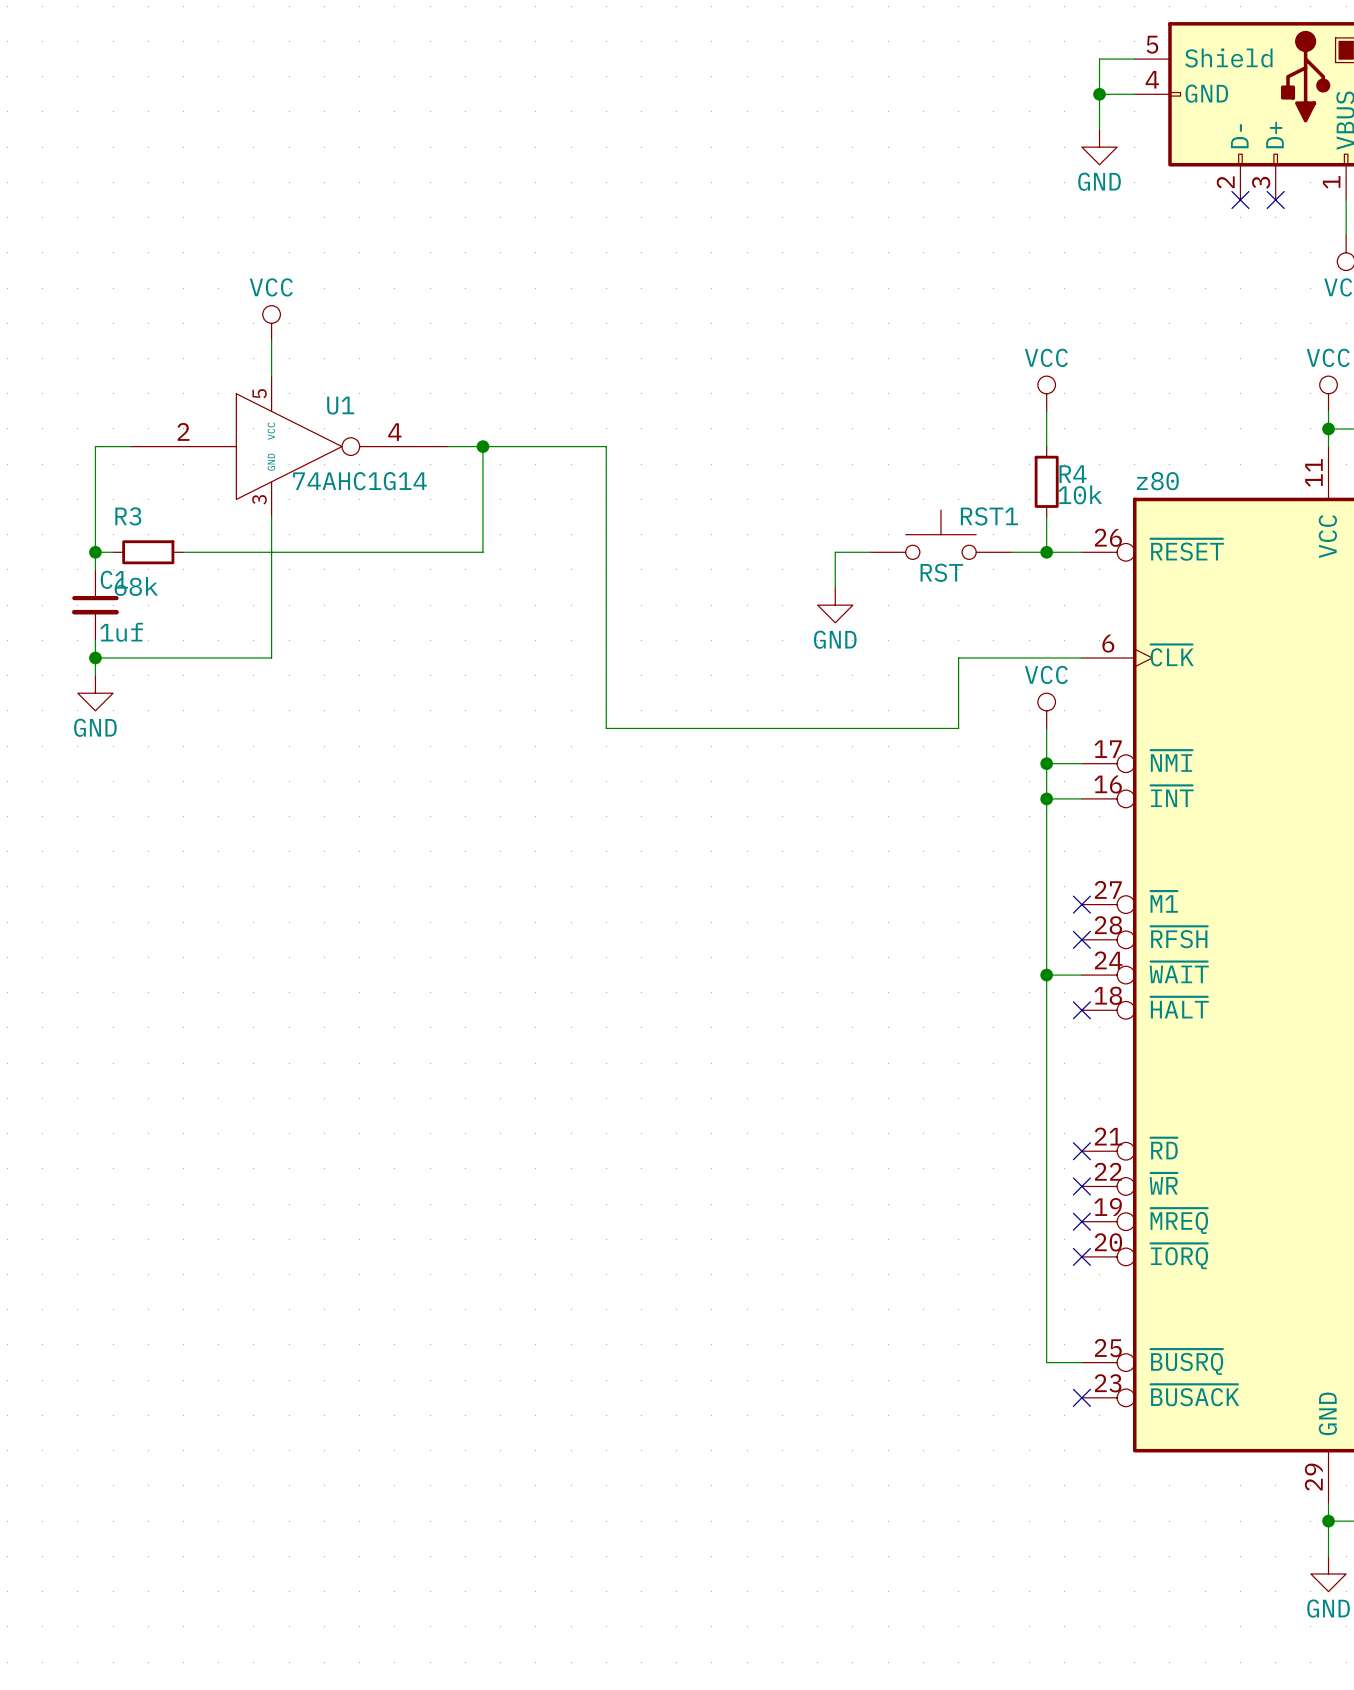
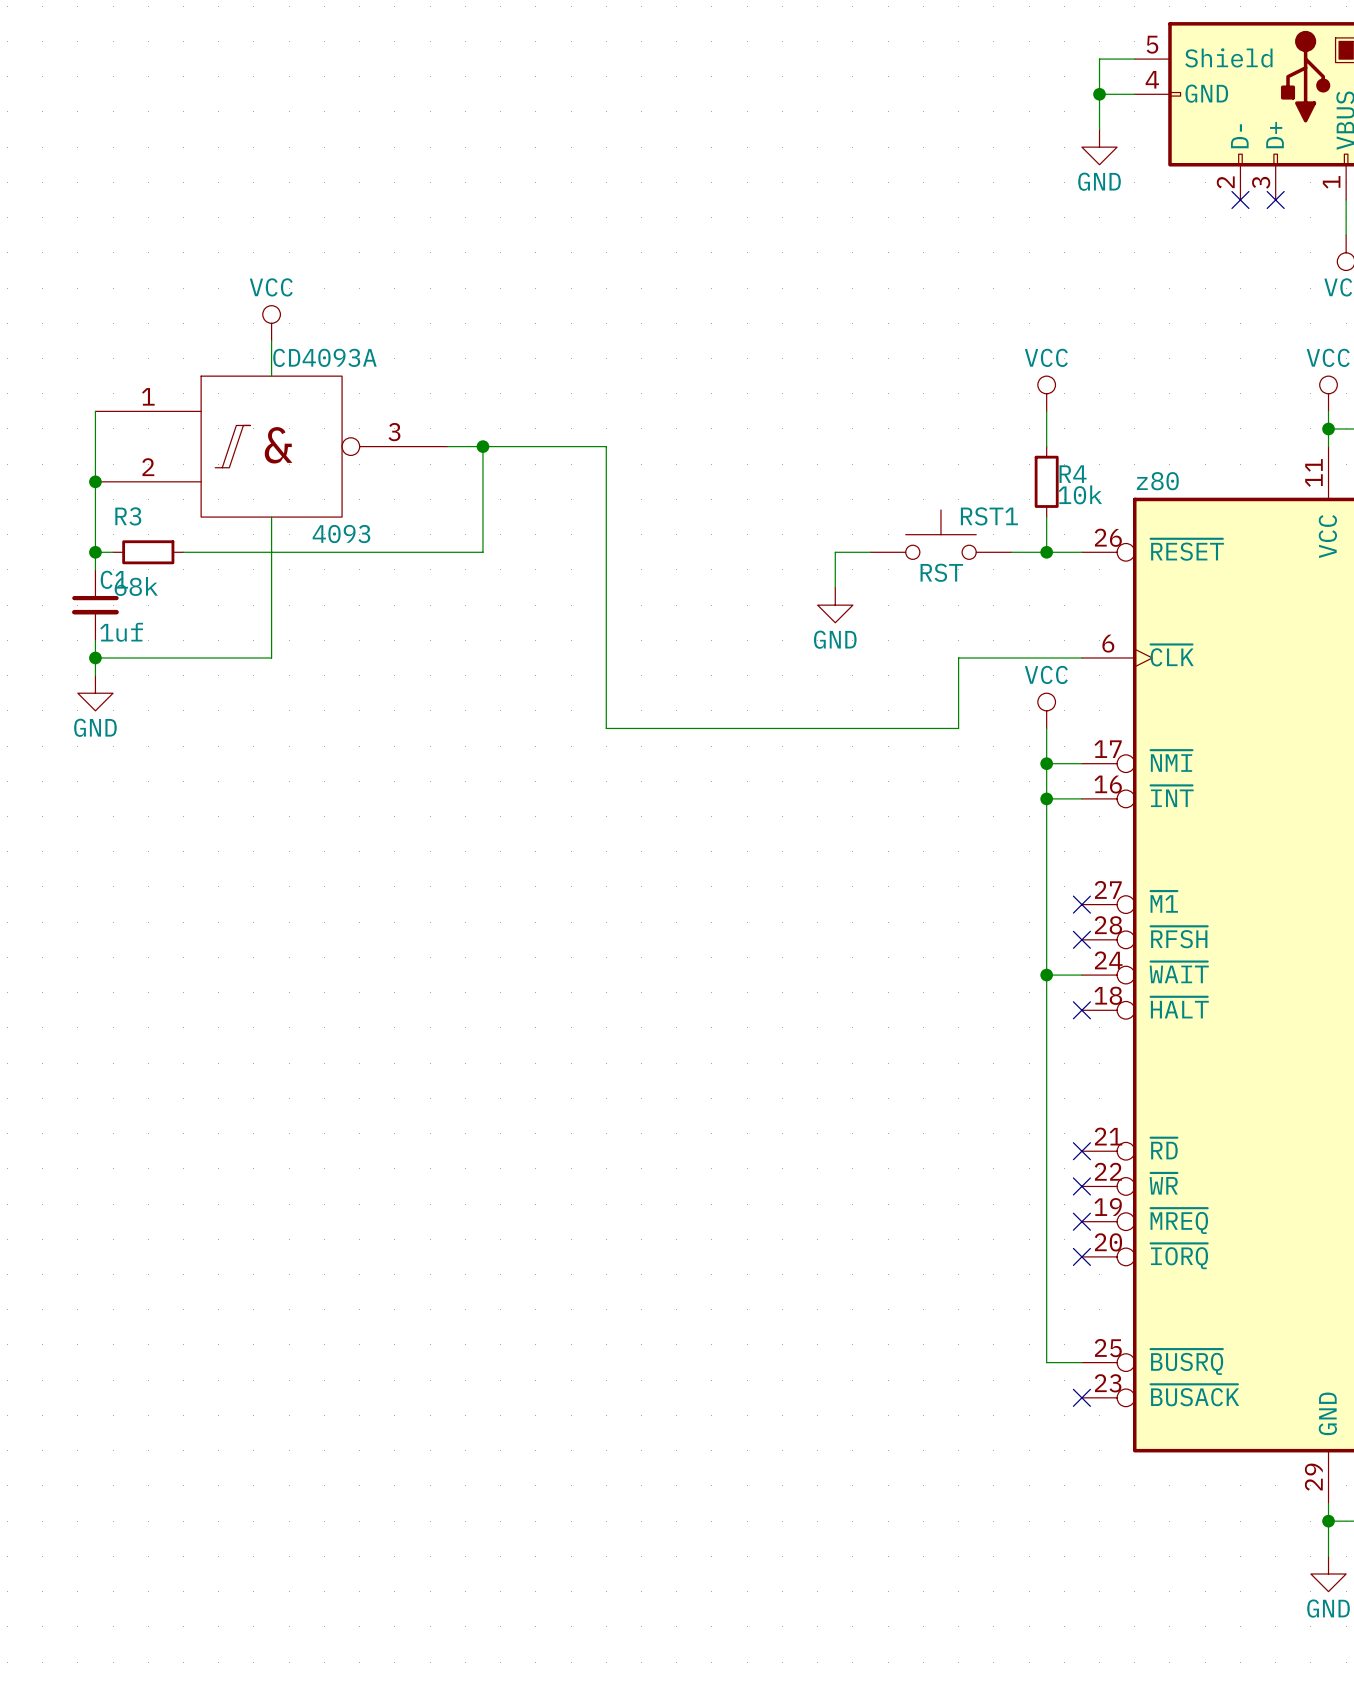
wire: (95, 446) (130, 446) -> (95, 446) (95, 411)
CD4093A: none -> 4093 (271, 446)
U1: 74AHC1G14 (289, 446) -> none
junction: none -> (95, 481)

